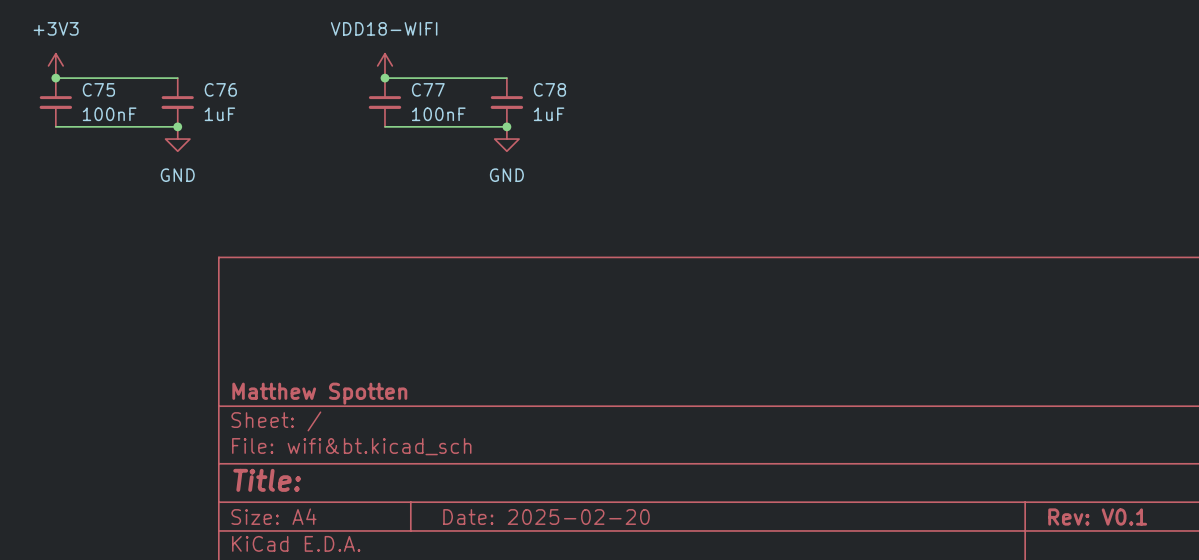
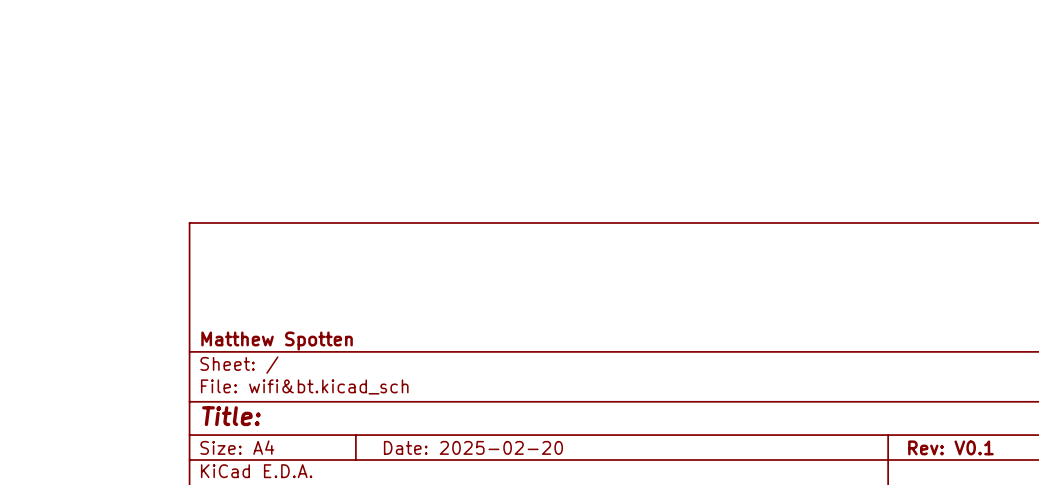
power symbol: +3V3 (55, 65) -> none
power symbol: VDD18-WIFI (384, 65) -> none
wire: (55, 78) (177, 78) -> none
junction: (55, 78) -> none
wire: (384, 78) (506, 78) -> none
junction: (384, 78) -> none
C75: 100nF (55, 102) -> none
C76: 1uF (177, 102) -> none
C77: 100nF (384, 102) -> none
C78: 1uF (506, 102) -> none
wire: (55, 126) (177, 126) -> none
junction: (177, 126) -> none
wire: (384, 126) (506, 126) -> none
junction: (506, 126) -> none
power symbol: GND (177, 139) -> none
power symbol: GND (506, 139) -> none

